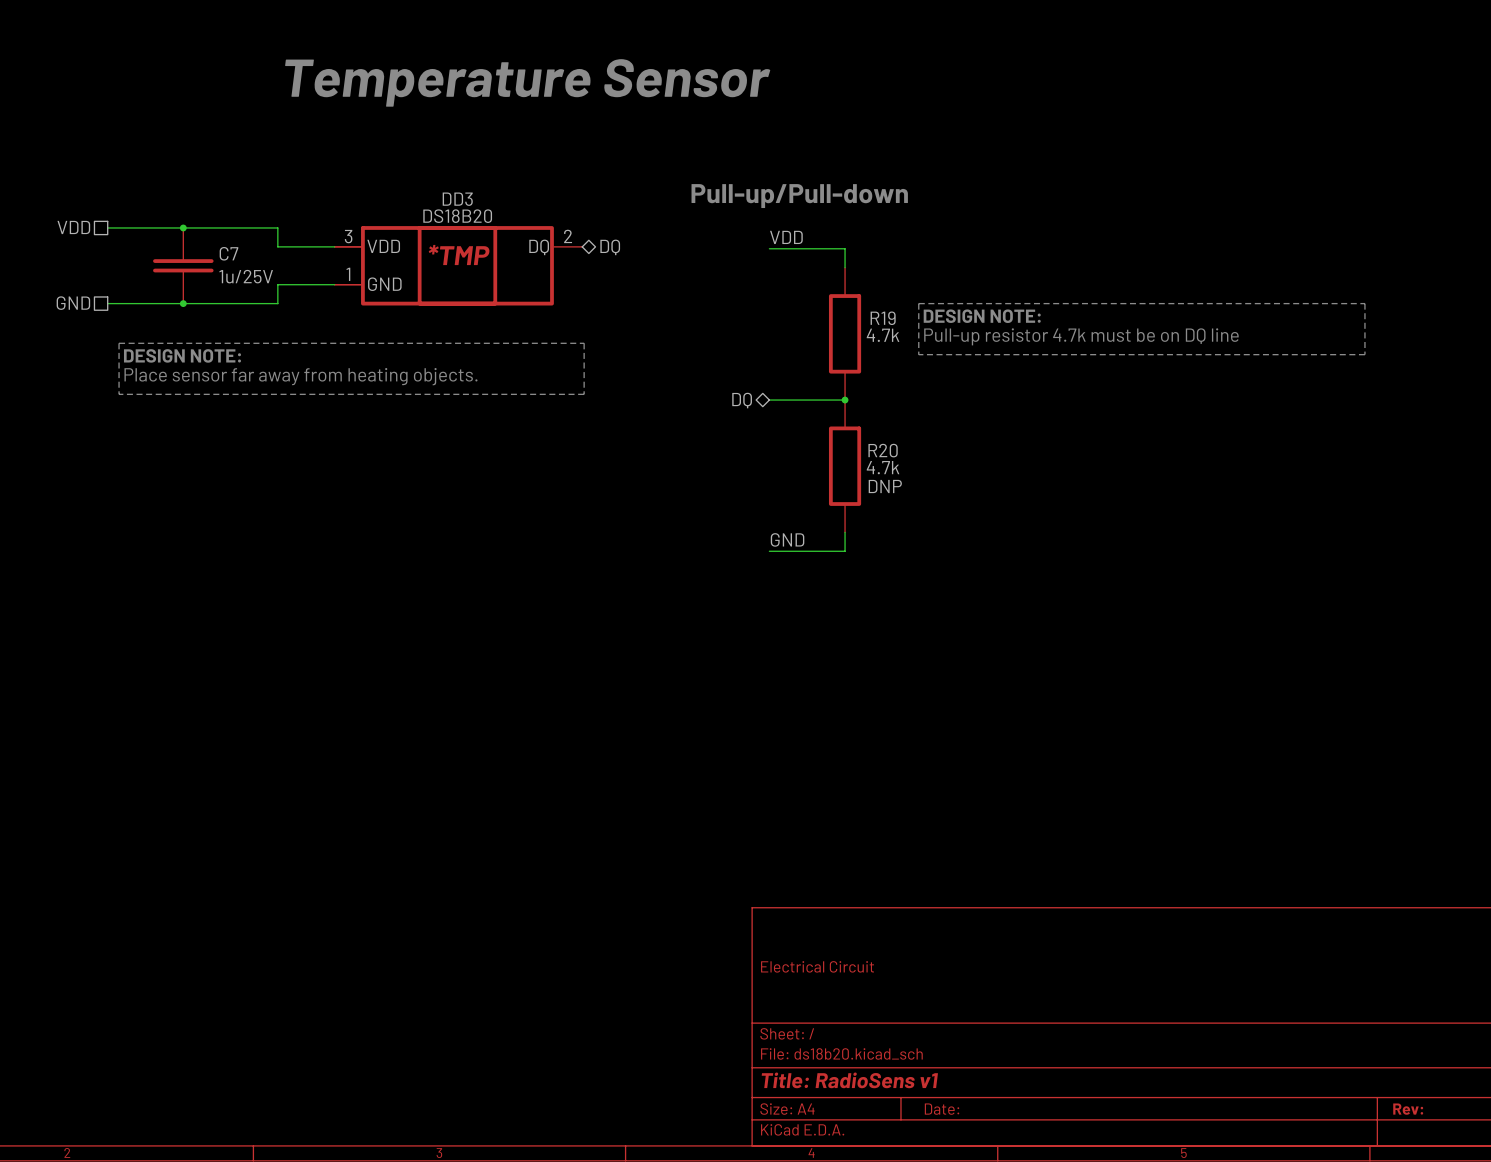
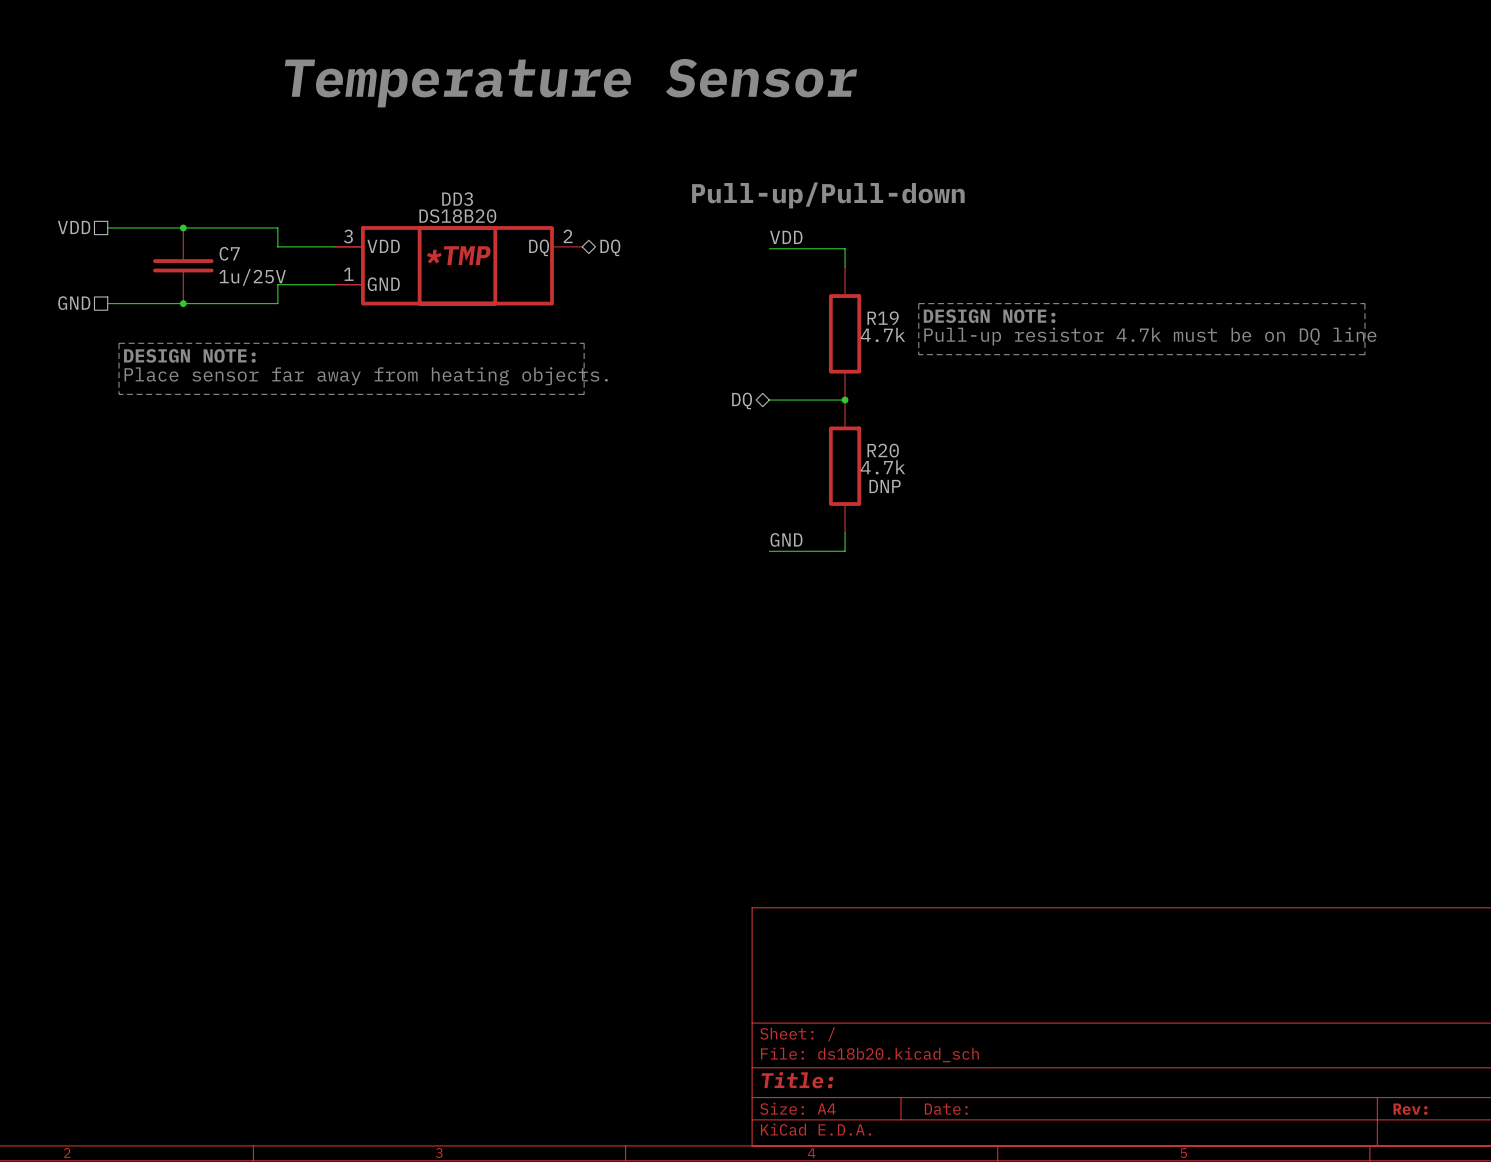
title block: Electrical Circuit (817, 966) -> none
title block: Title: RadioSens v1 (849, 1080) -> Title: (797, 1080)

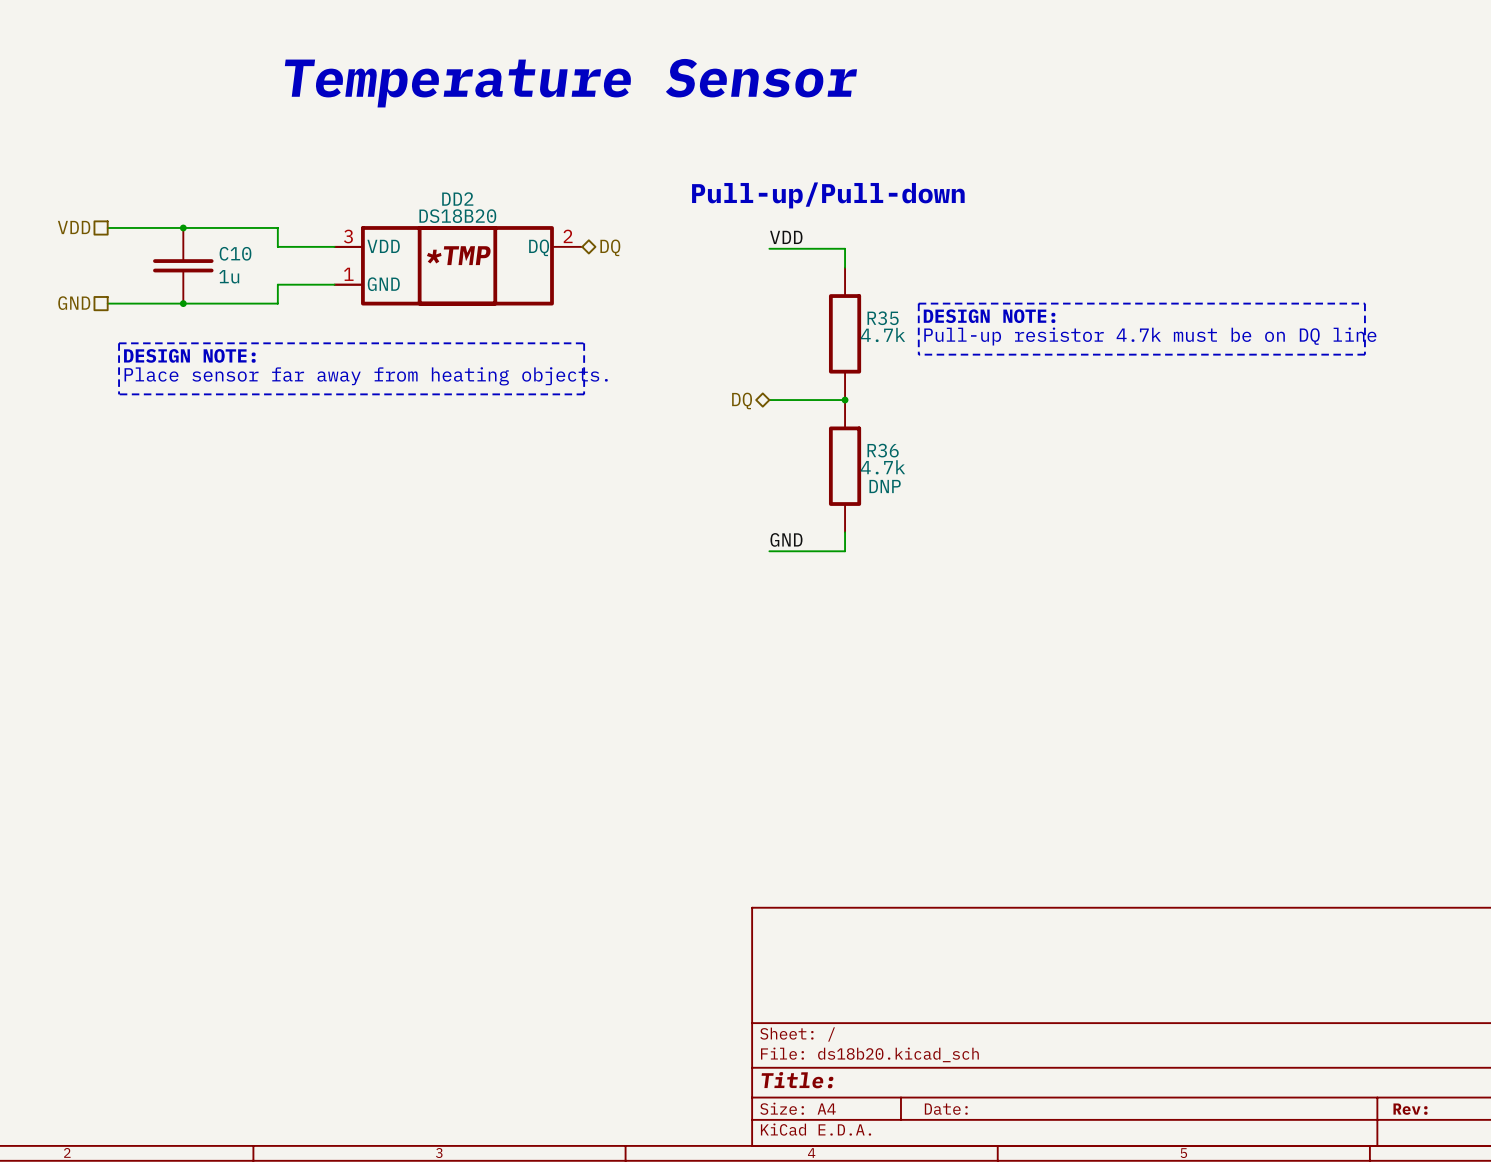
DD3 name: DD3 (457, 199) -> DD2 (457, 199)
C7 name: C7 (229, 253) -> C10 (235, 253)
C7 value: 1u/25V (252, 277) -> 1u (229, 276)
R19 name: R19 (883, 318) -> R35 (883, 318)
R20 name: R20 (883, 450) -> R36 (883, 450)

